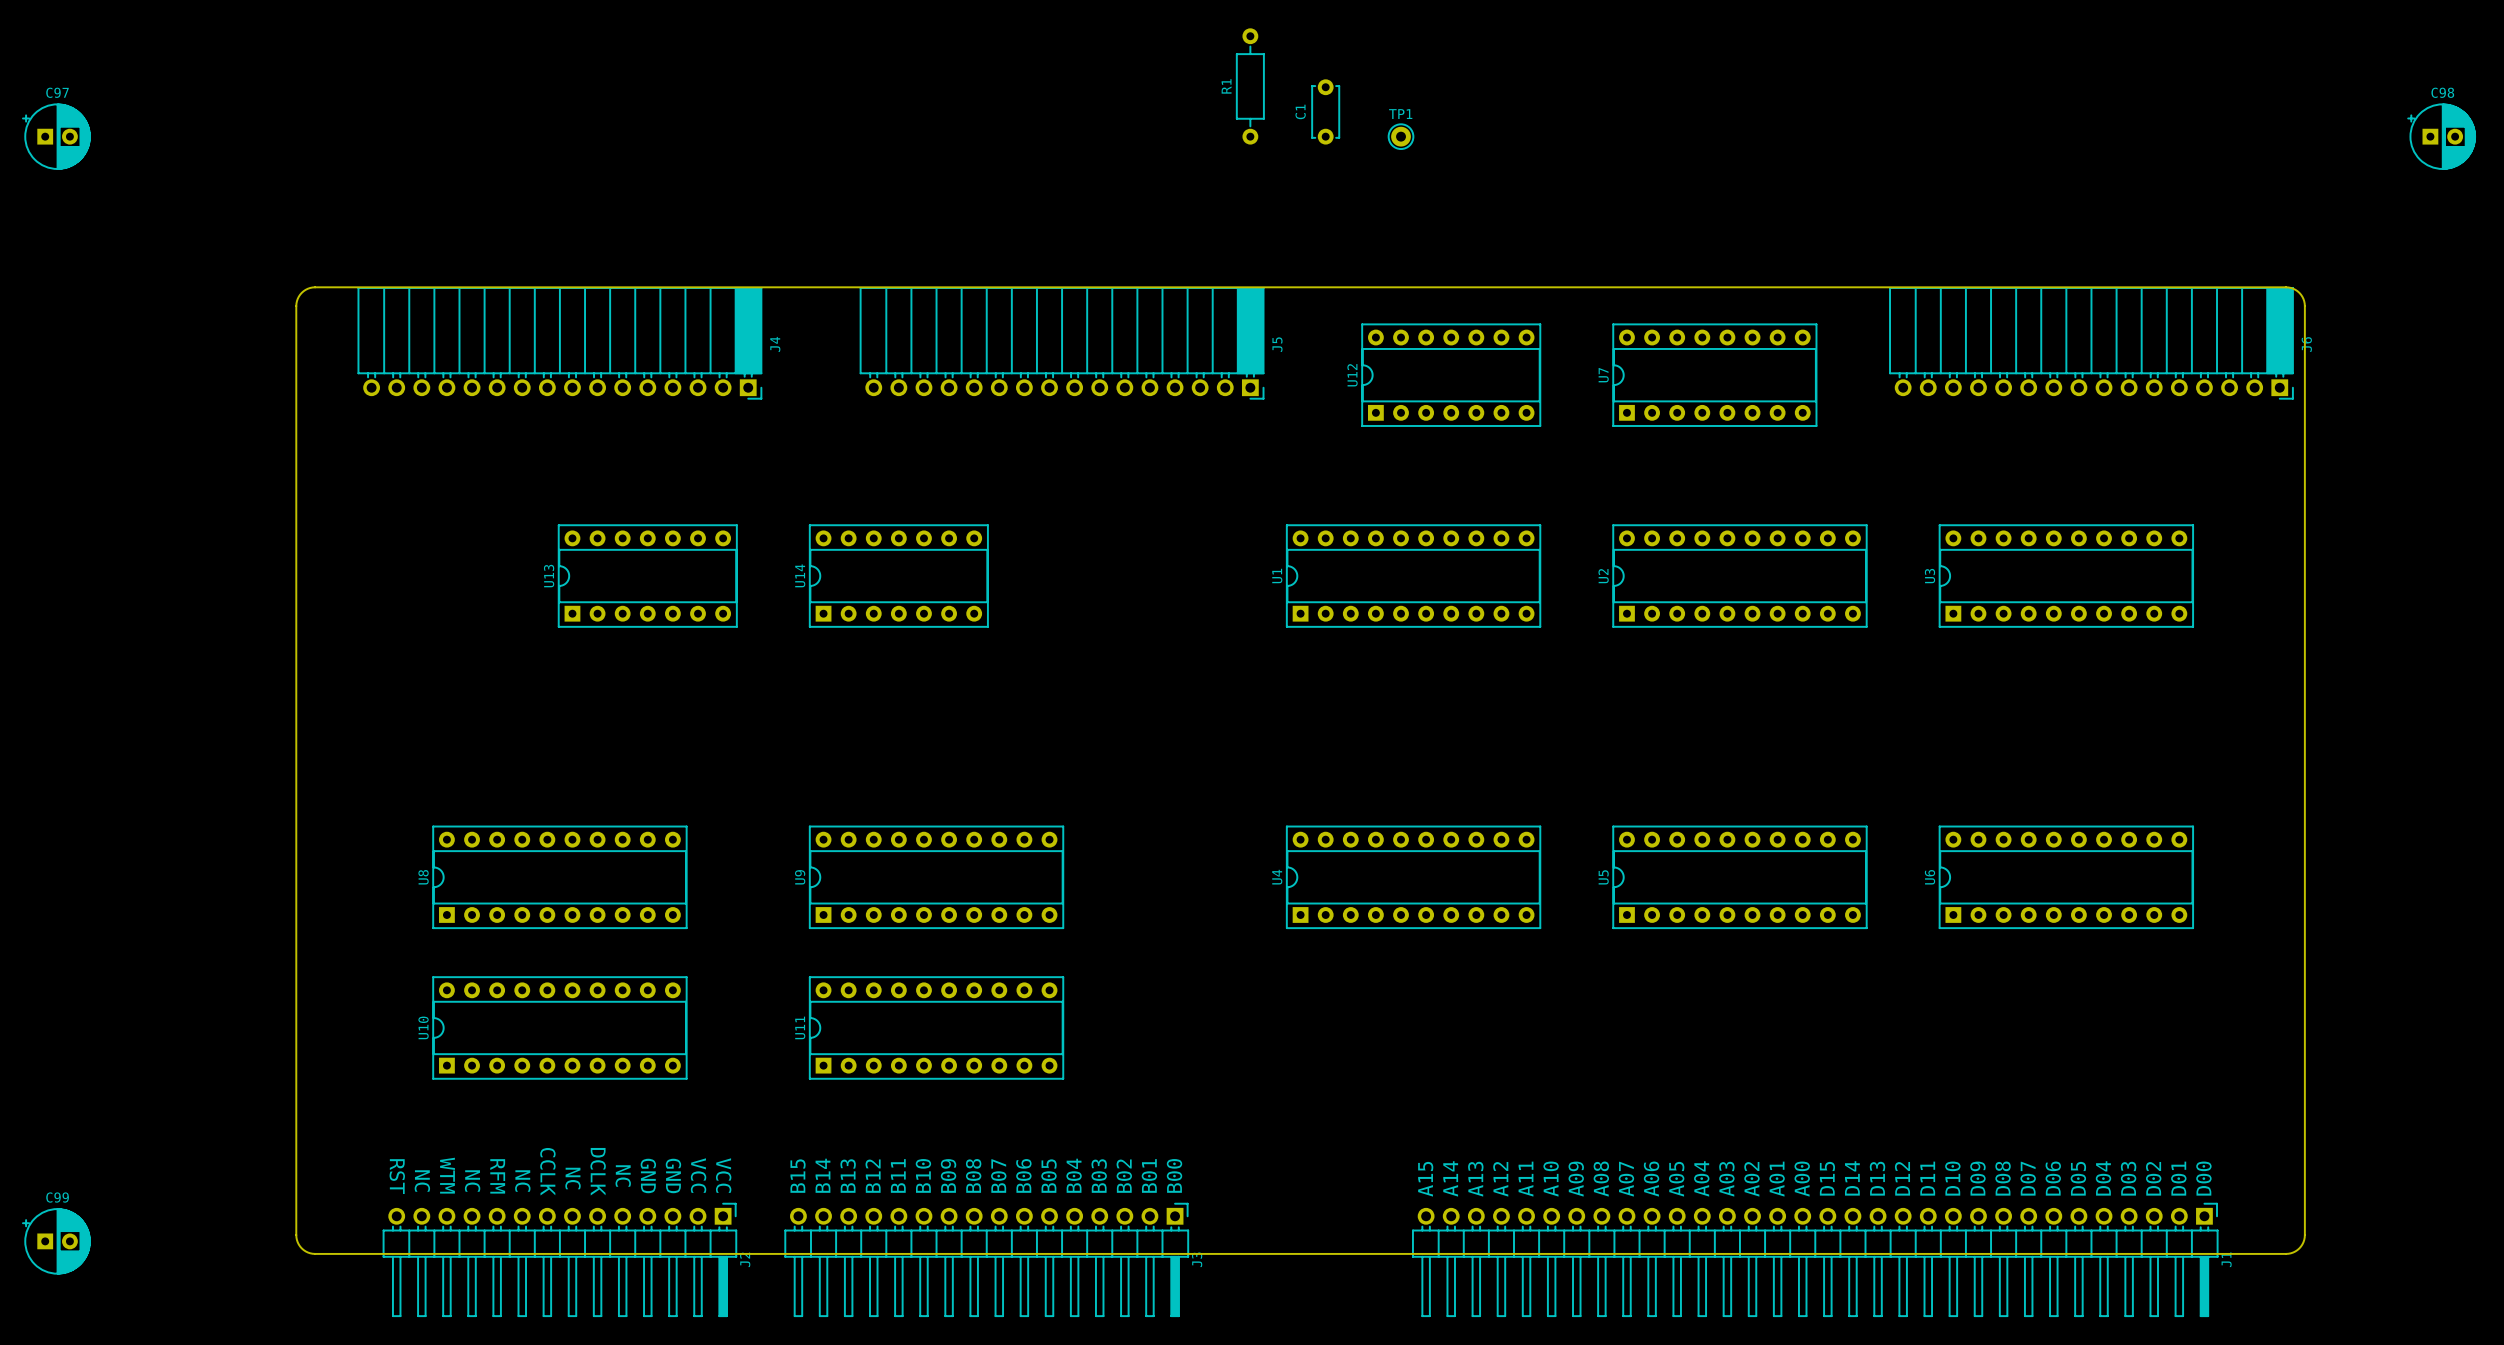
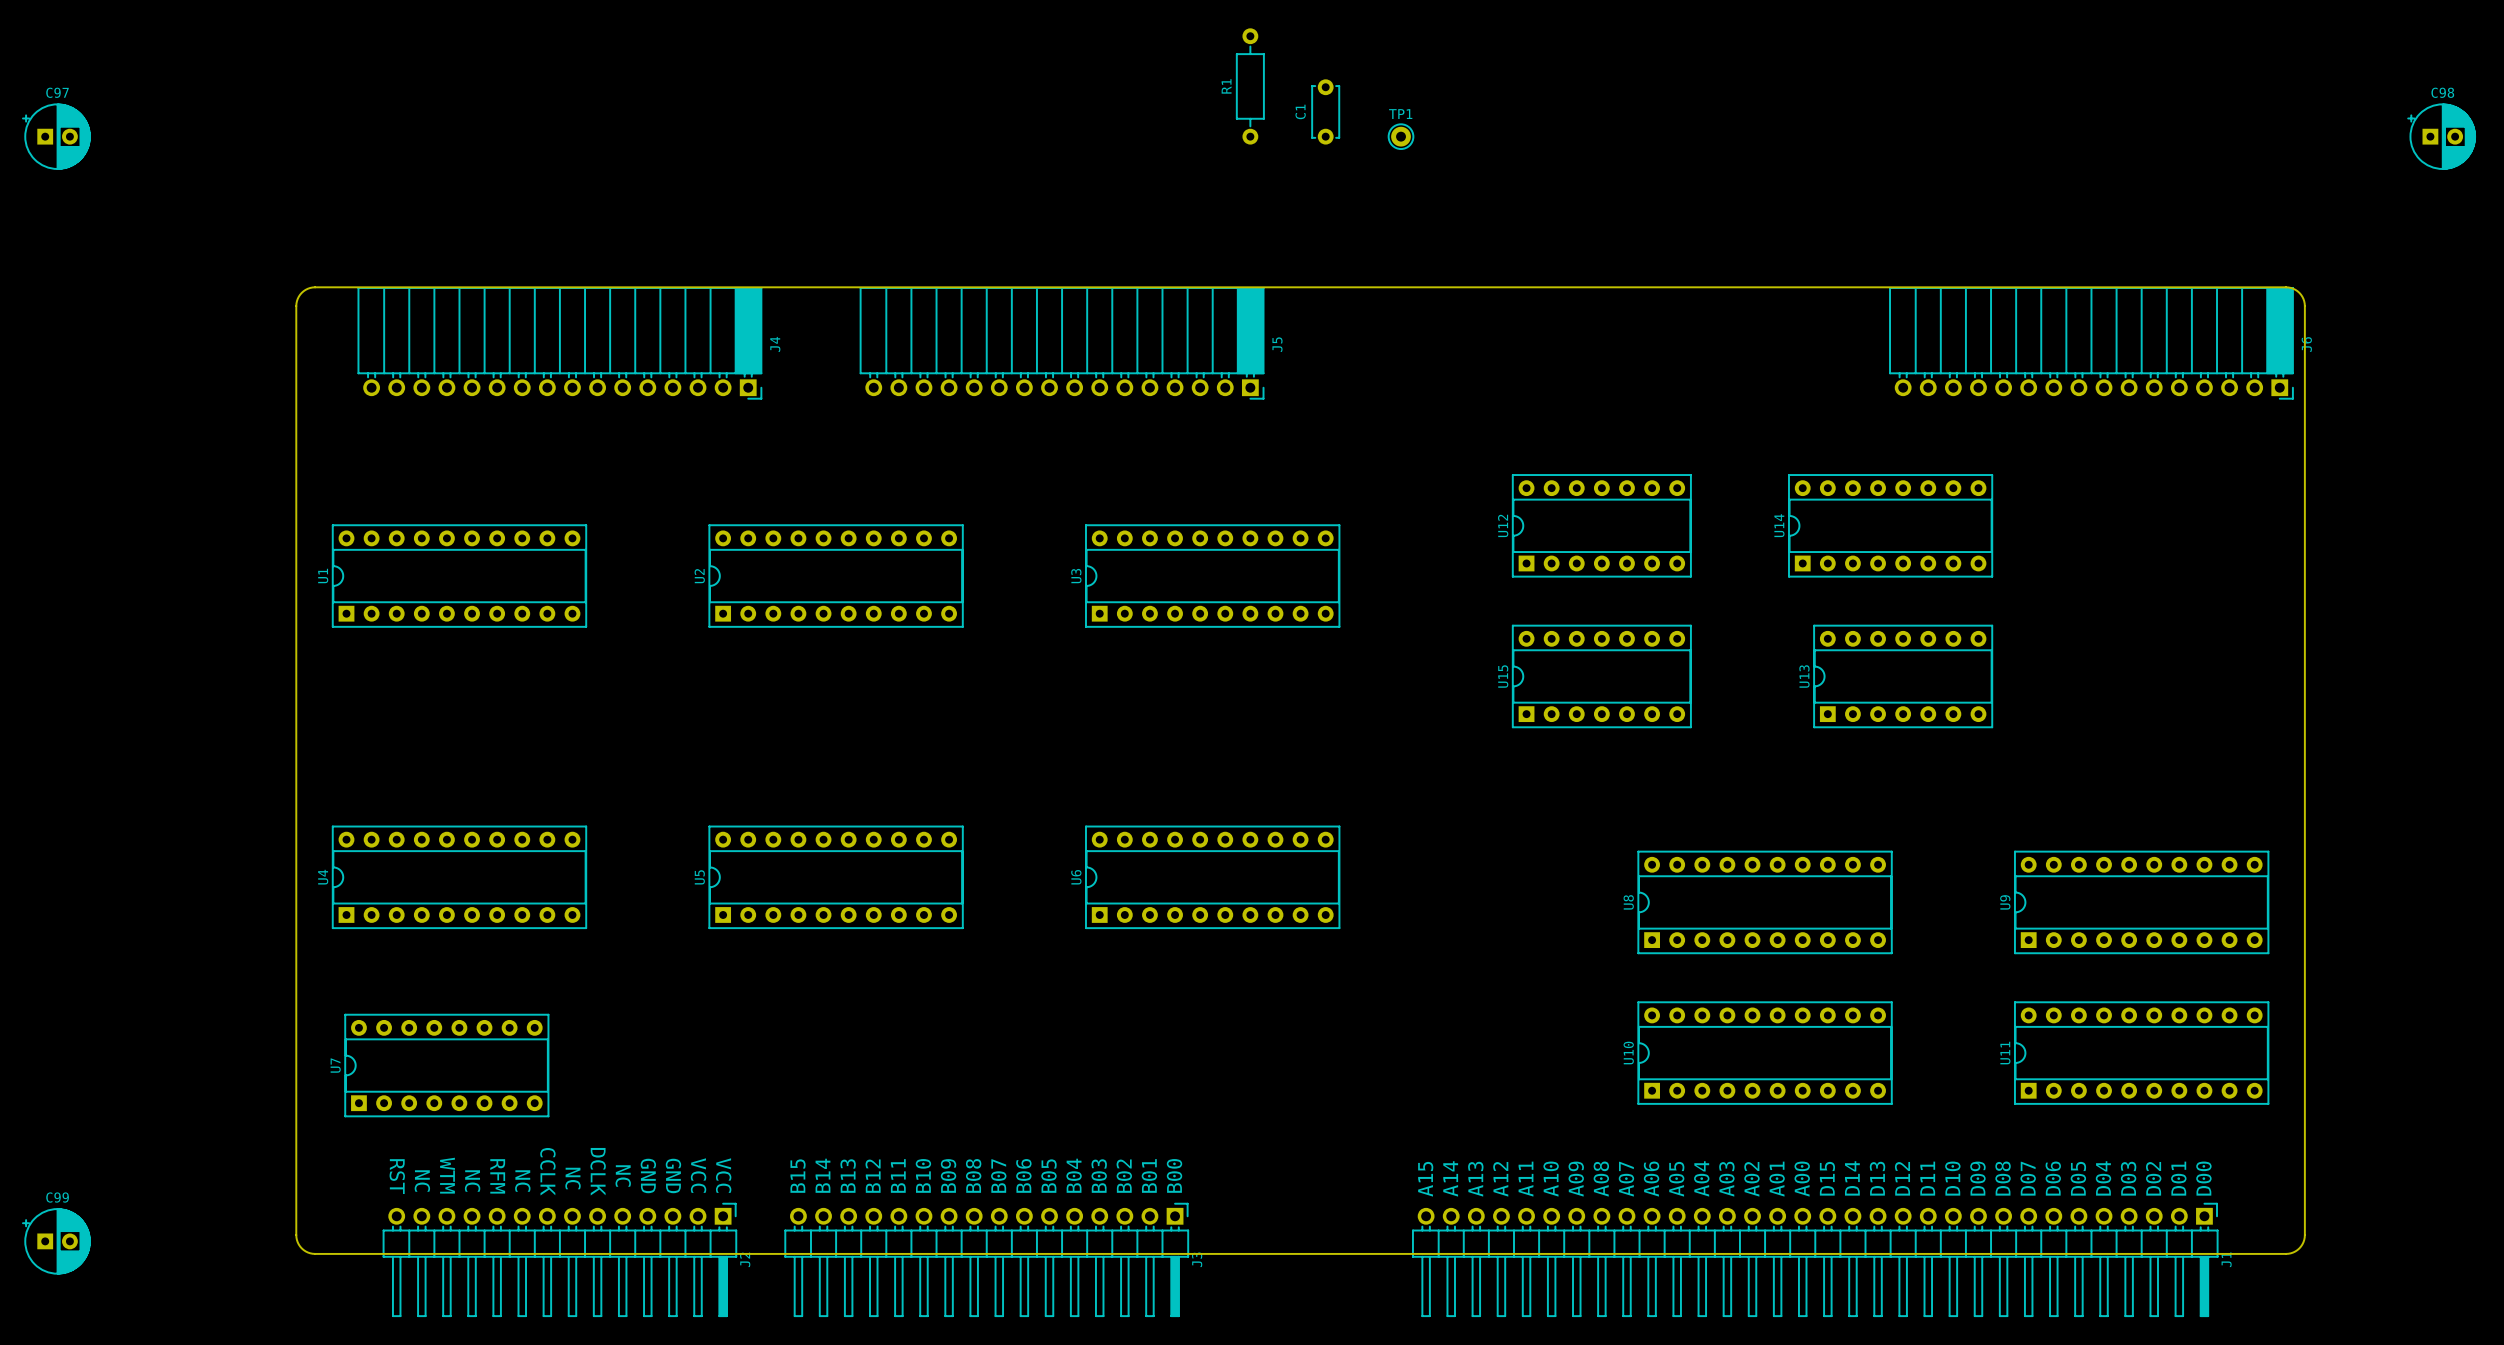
U12 position: (1451, 375) -> (1601, 525)
U7 position: (1714, 375) -> (446, 1065)
U14 footprint: [809, 524, 989, 628] -> [1788, 474, 1993, 578]
U13 position: (647, 576) -> (1903, 676)
U1 position: (1413, 576) -> (459, 576)
U2 position: (1739, 576) -> (836, 576)
U3 position: (2066, 576) -> (1212, 576)
U15: none -> (1601, 676)
U8 position: (559, 877) -> (1765, 902)
U9 position: (936, 877) -> (2141, 902)
U4 position: (1413, 877) -> (459, 877)
U5 position: (1739, 877) -> (836, 877)
U6 position: (2066, 877) -> (1212, 877)
U10 position: (559, 1027) -> (1765, 1053)
U11 position: (936, 1027) -> (2141, 1053)

